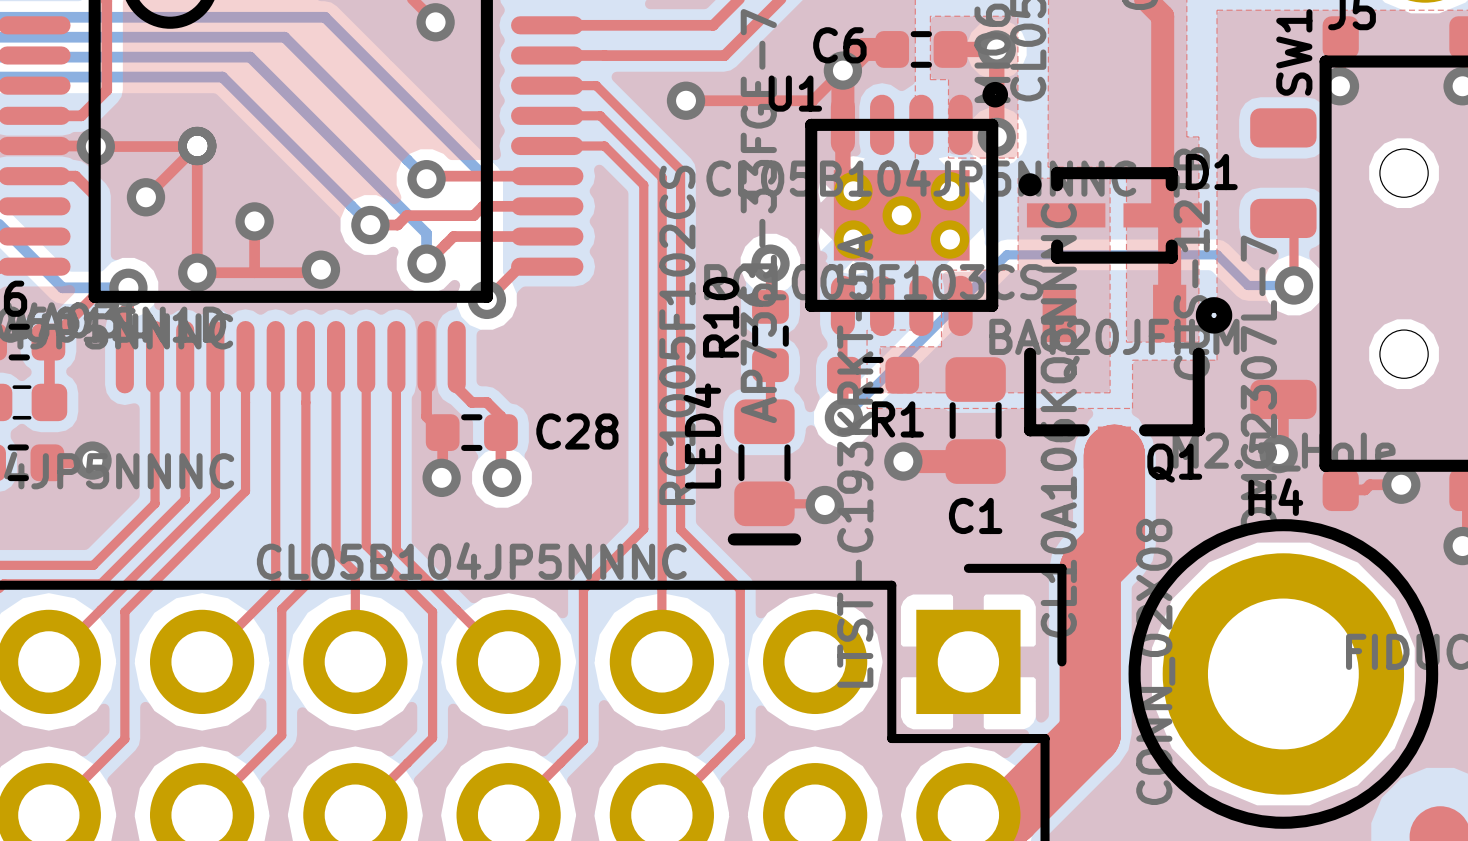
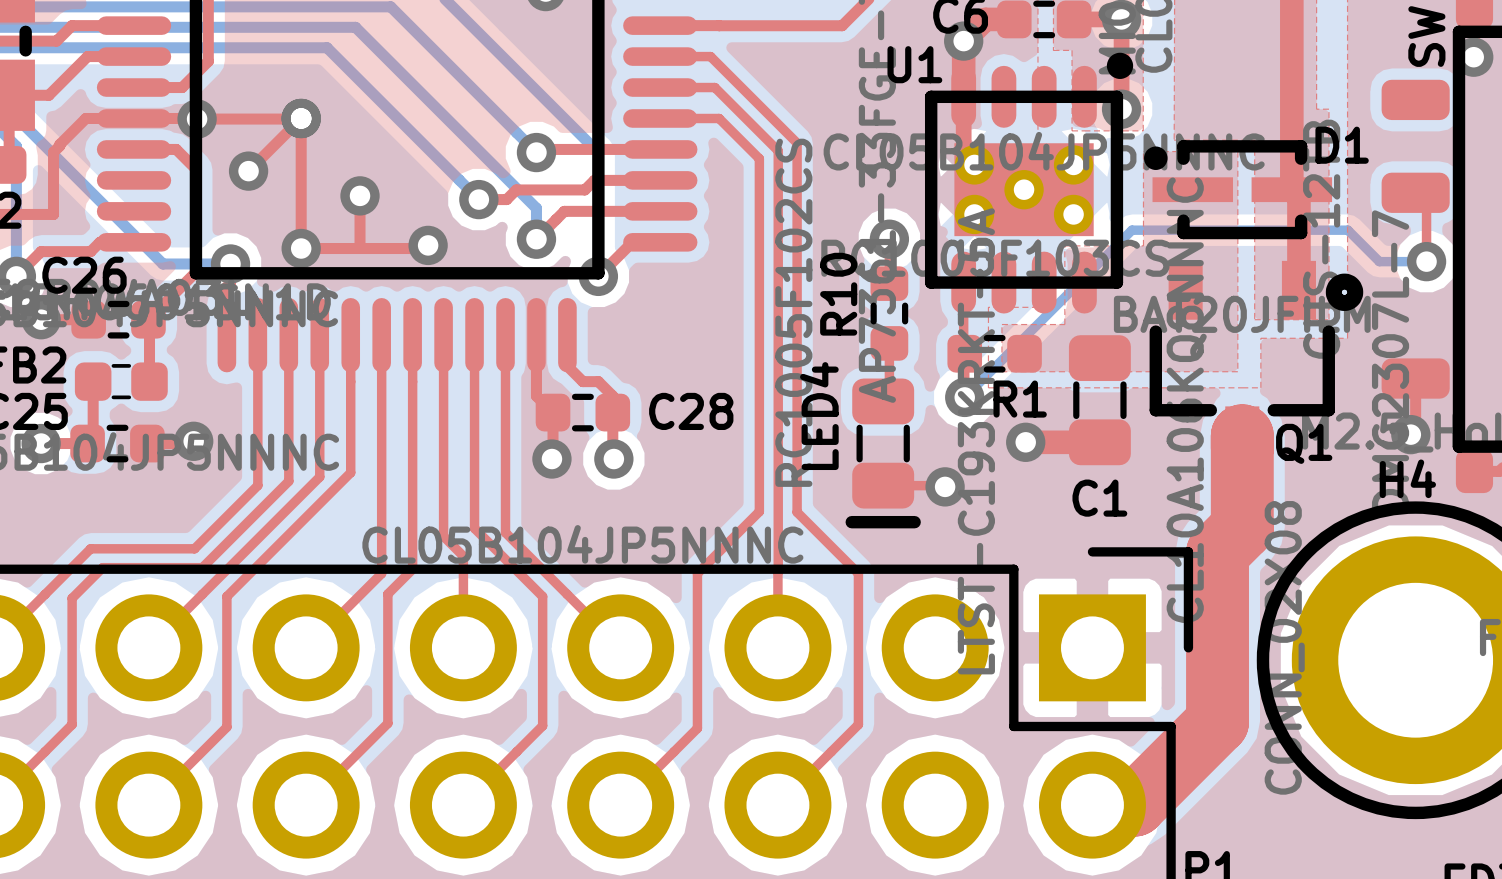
top track: (842, 70) (812, 100) (686, 100) -> none
via: (686, 100) -> none

